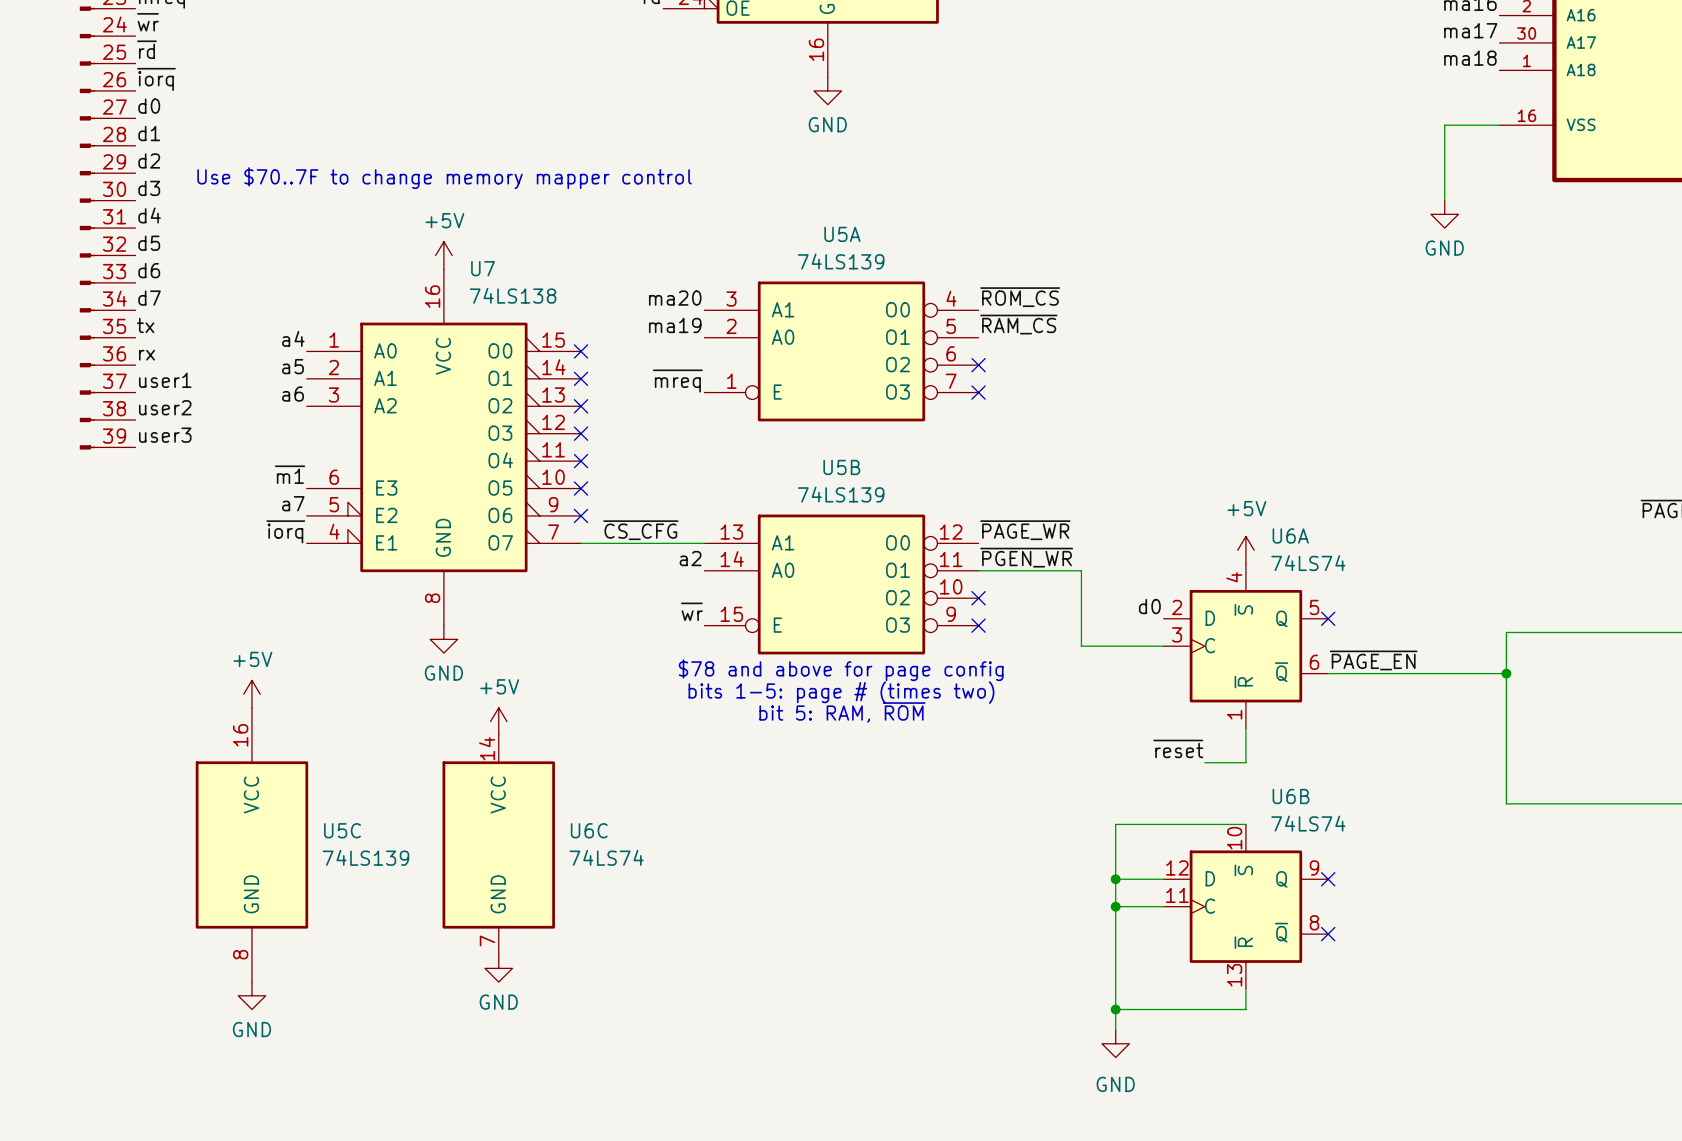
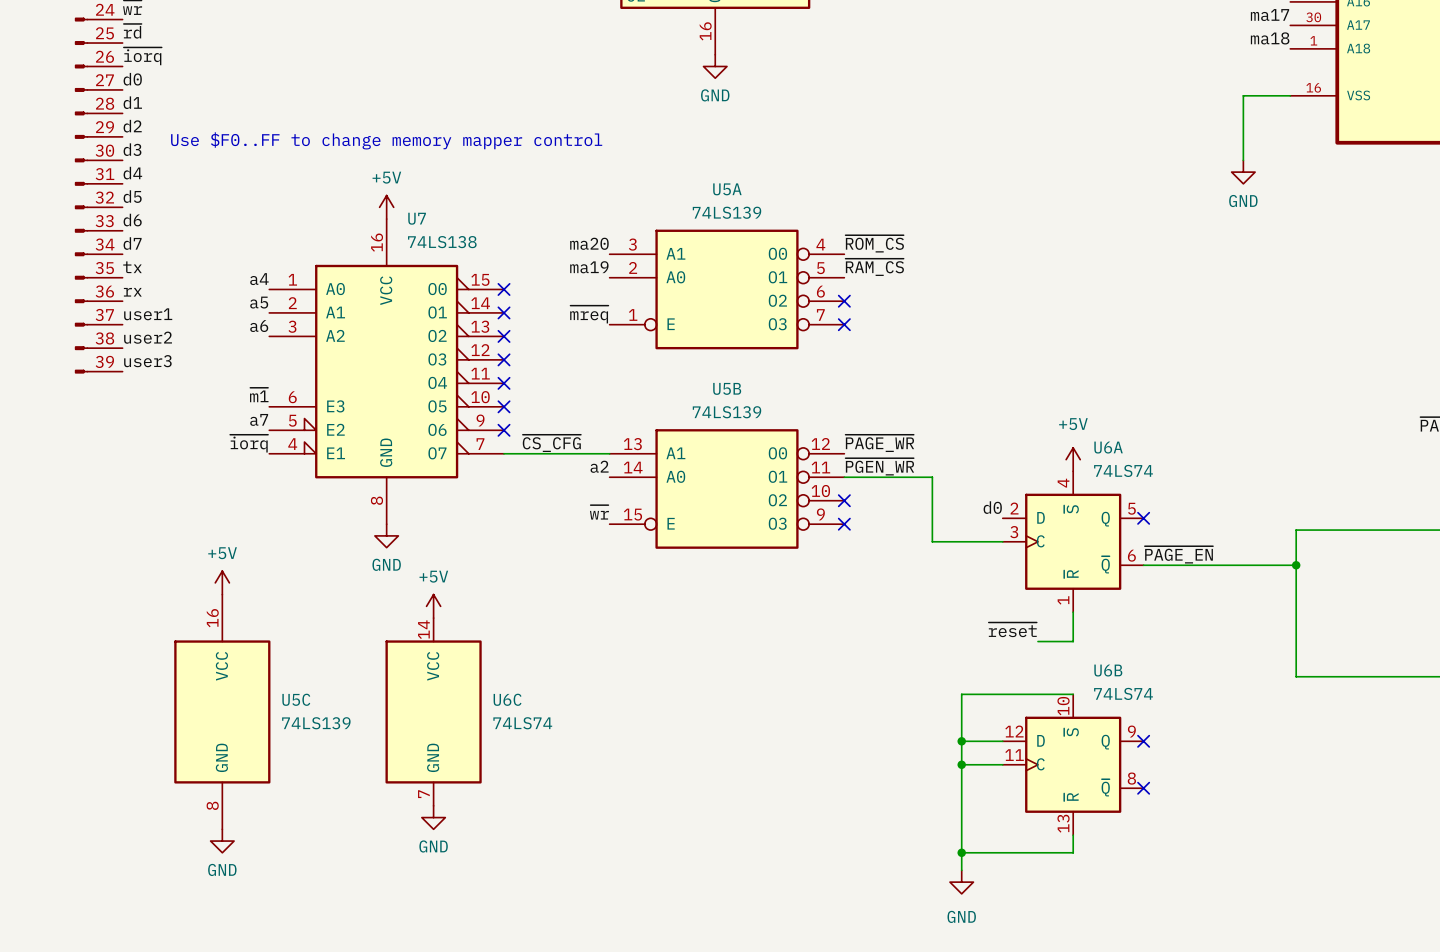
text: Use $70..7F to change memory mapper control (444, 178) -> Use $F0..FF to change memory mapper control (386, 140)
text: $78 and above for page config (841, 670) -> none
text: bits 1-5: page # (times two) (841, 692) -> none
text: bit 5: RAM, ~{ROM} (842, 712) -> none

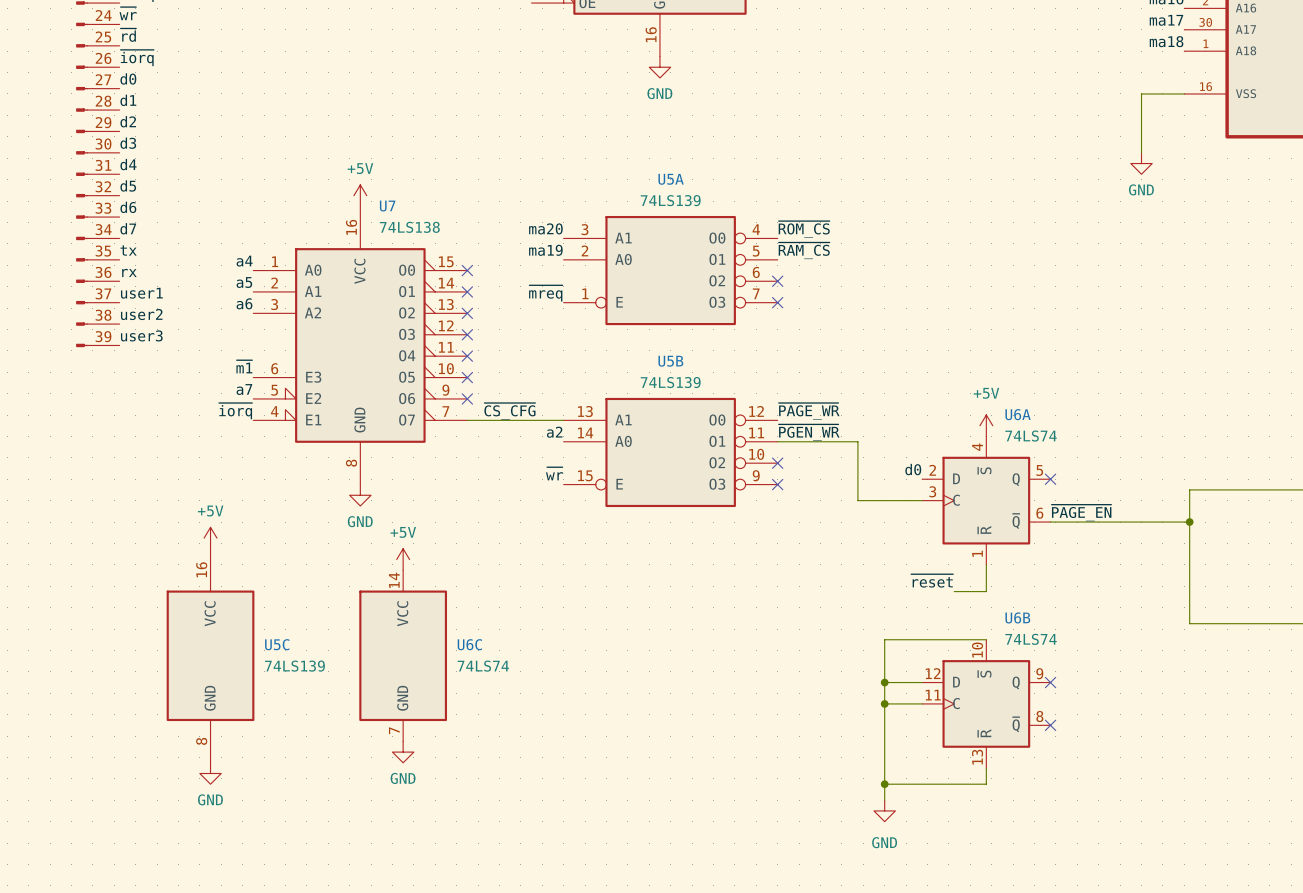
text: Use $F0..FF to change memory mapper control (386, 140) -> none

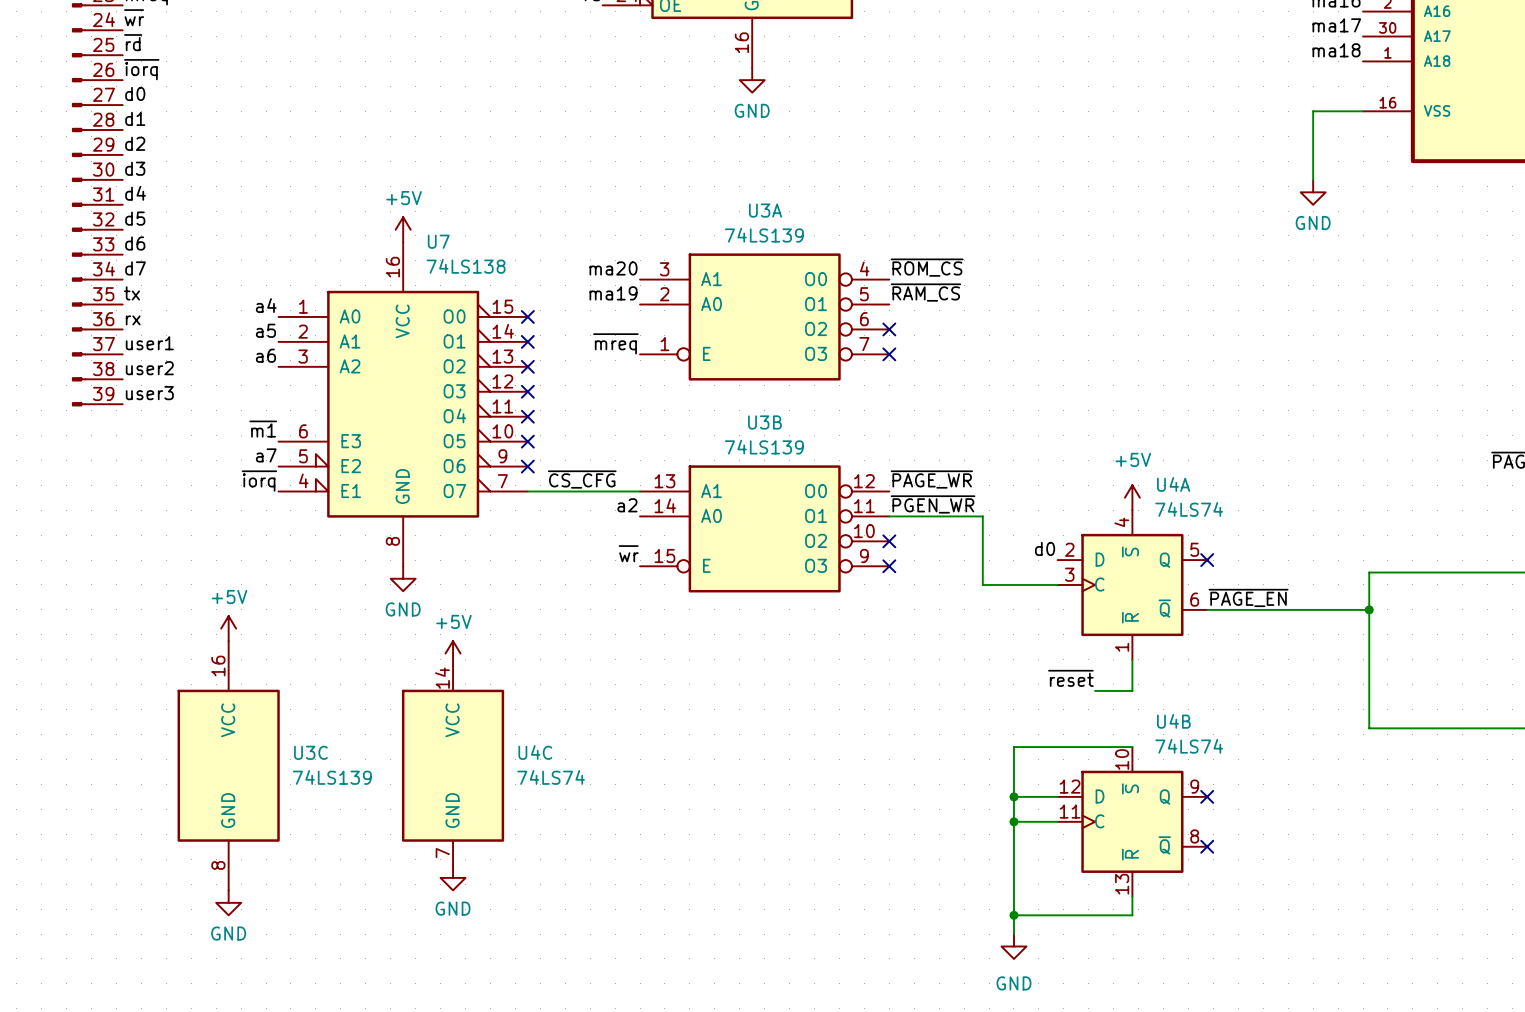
U5A name: U5A (671, 179) -> U3A (765, 210)
U5B name: U5B (670, 361) -> U3B (764, 422)
U6A name: U6A (1018, 414) -> U4A (1173, 484)
U6B name: U6B (1017, 617) -> U4B (1173, 721)
U5C name: U5C (277, 644) -> U3C (310, 752)
U6C name: U6C (469, 644) -> U4C (535, 752)

